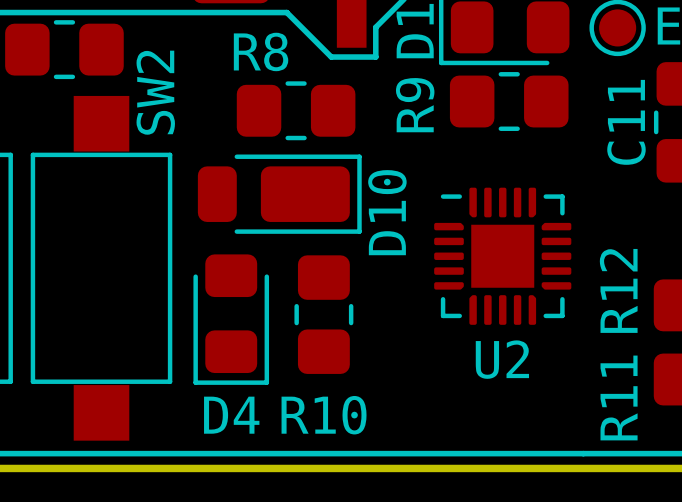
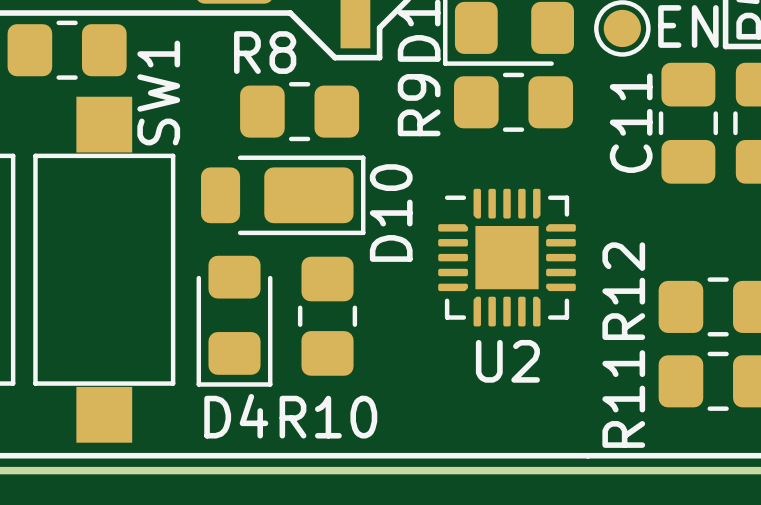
SW2 name: SW2 (155, 92) -> SW1 (158, 92)

